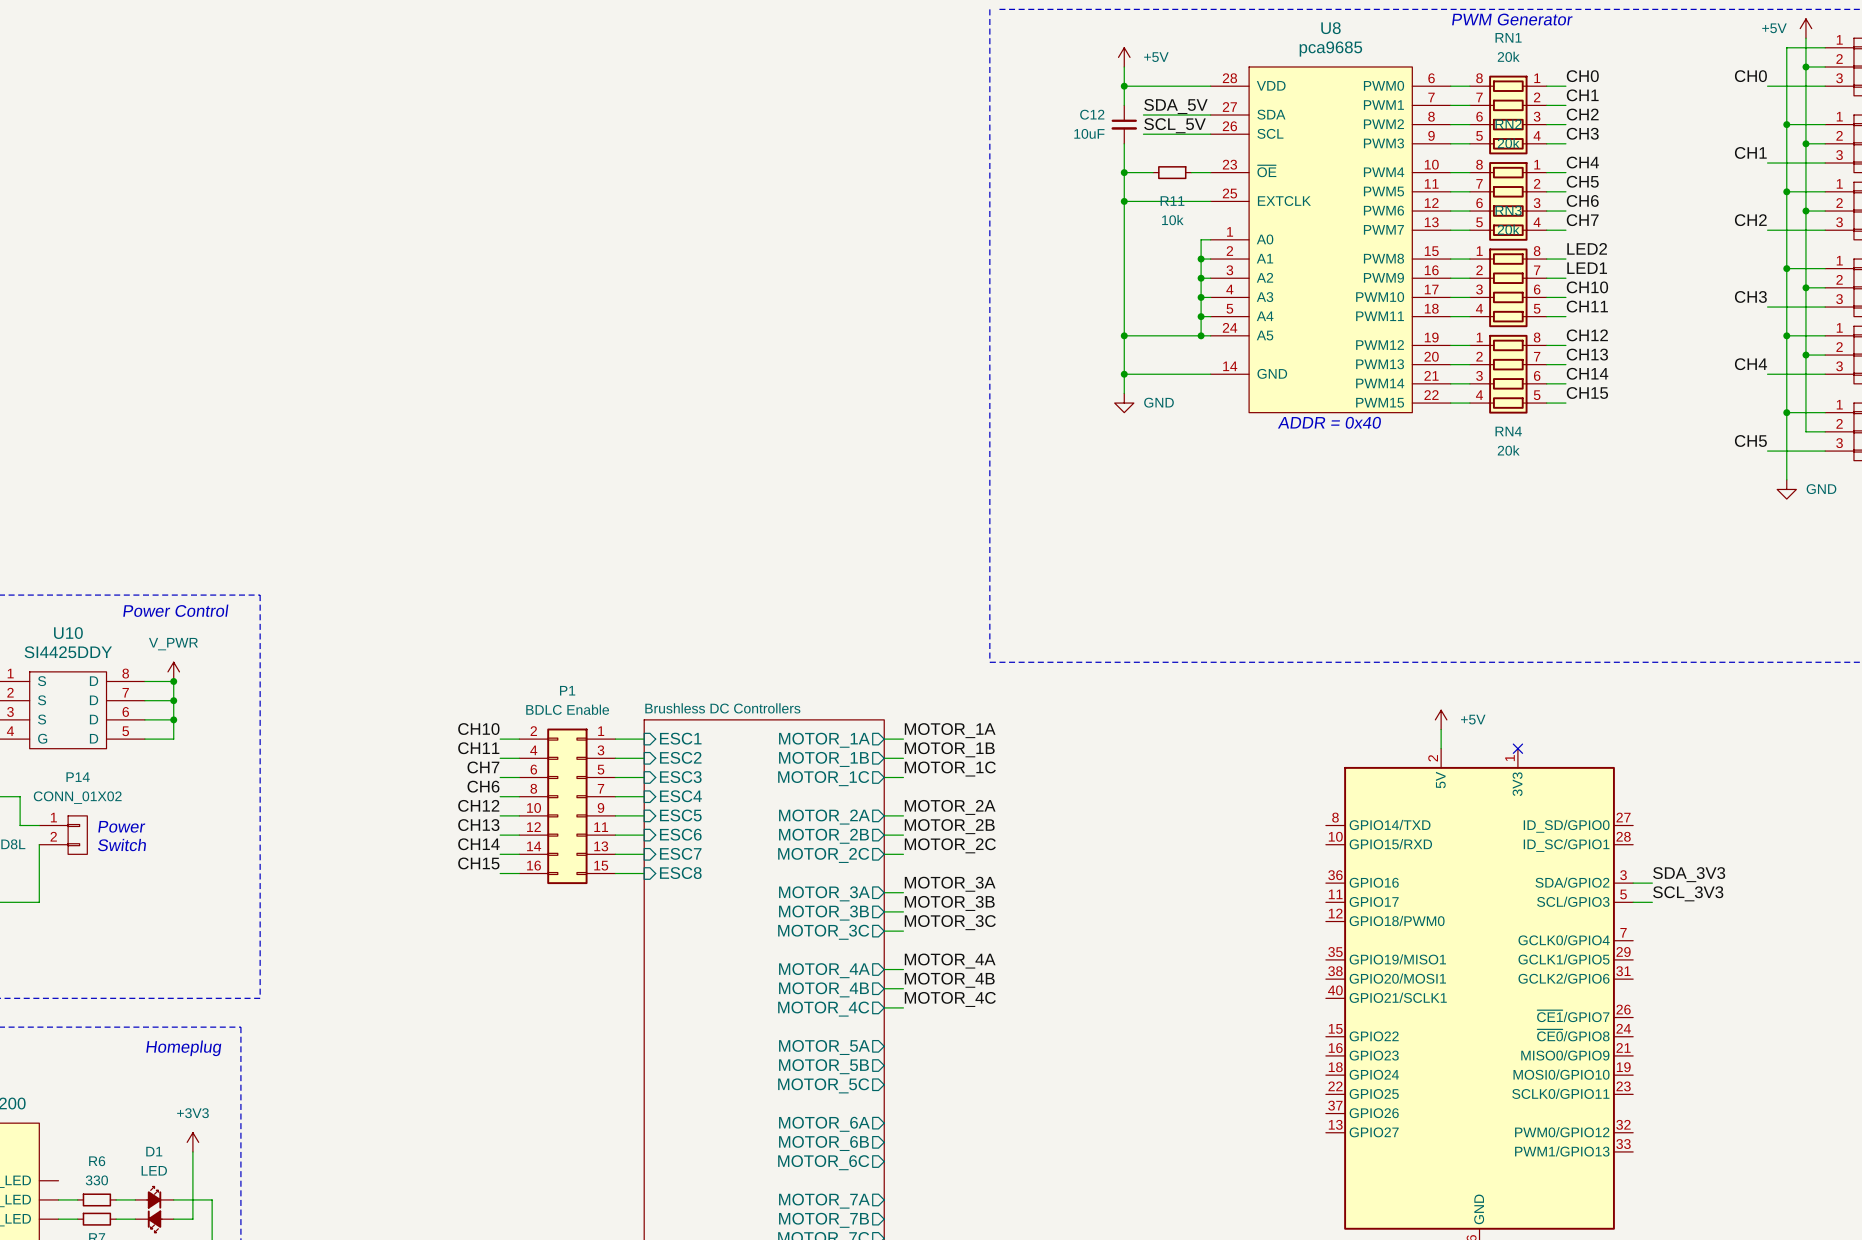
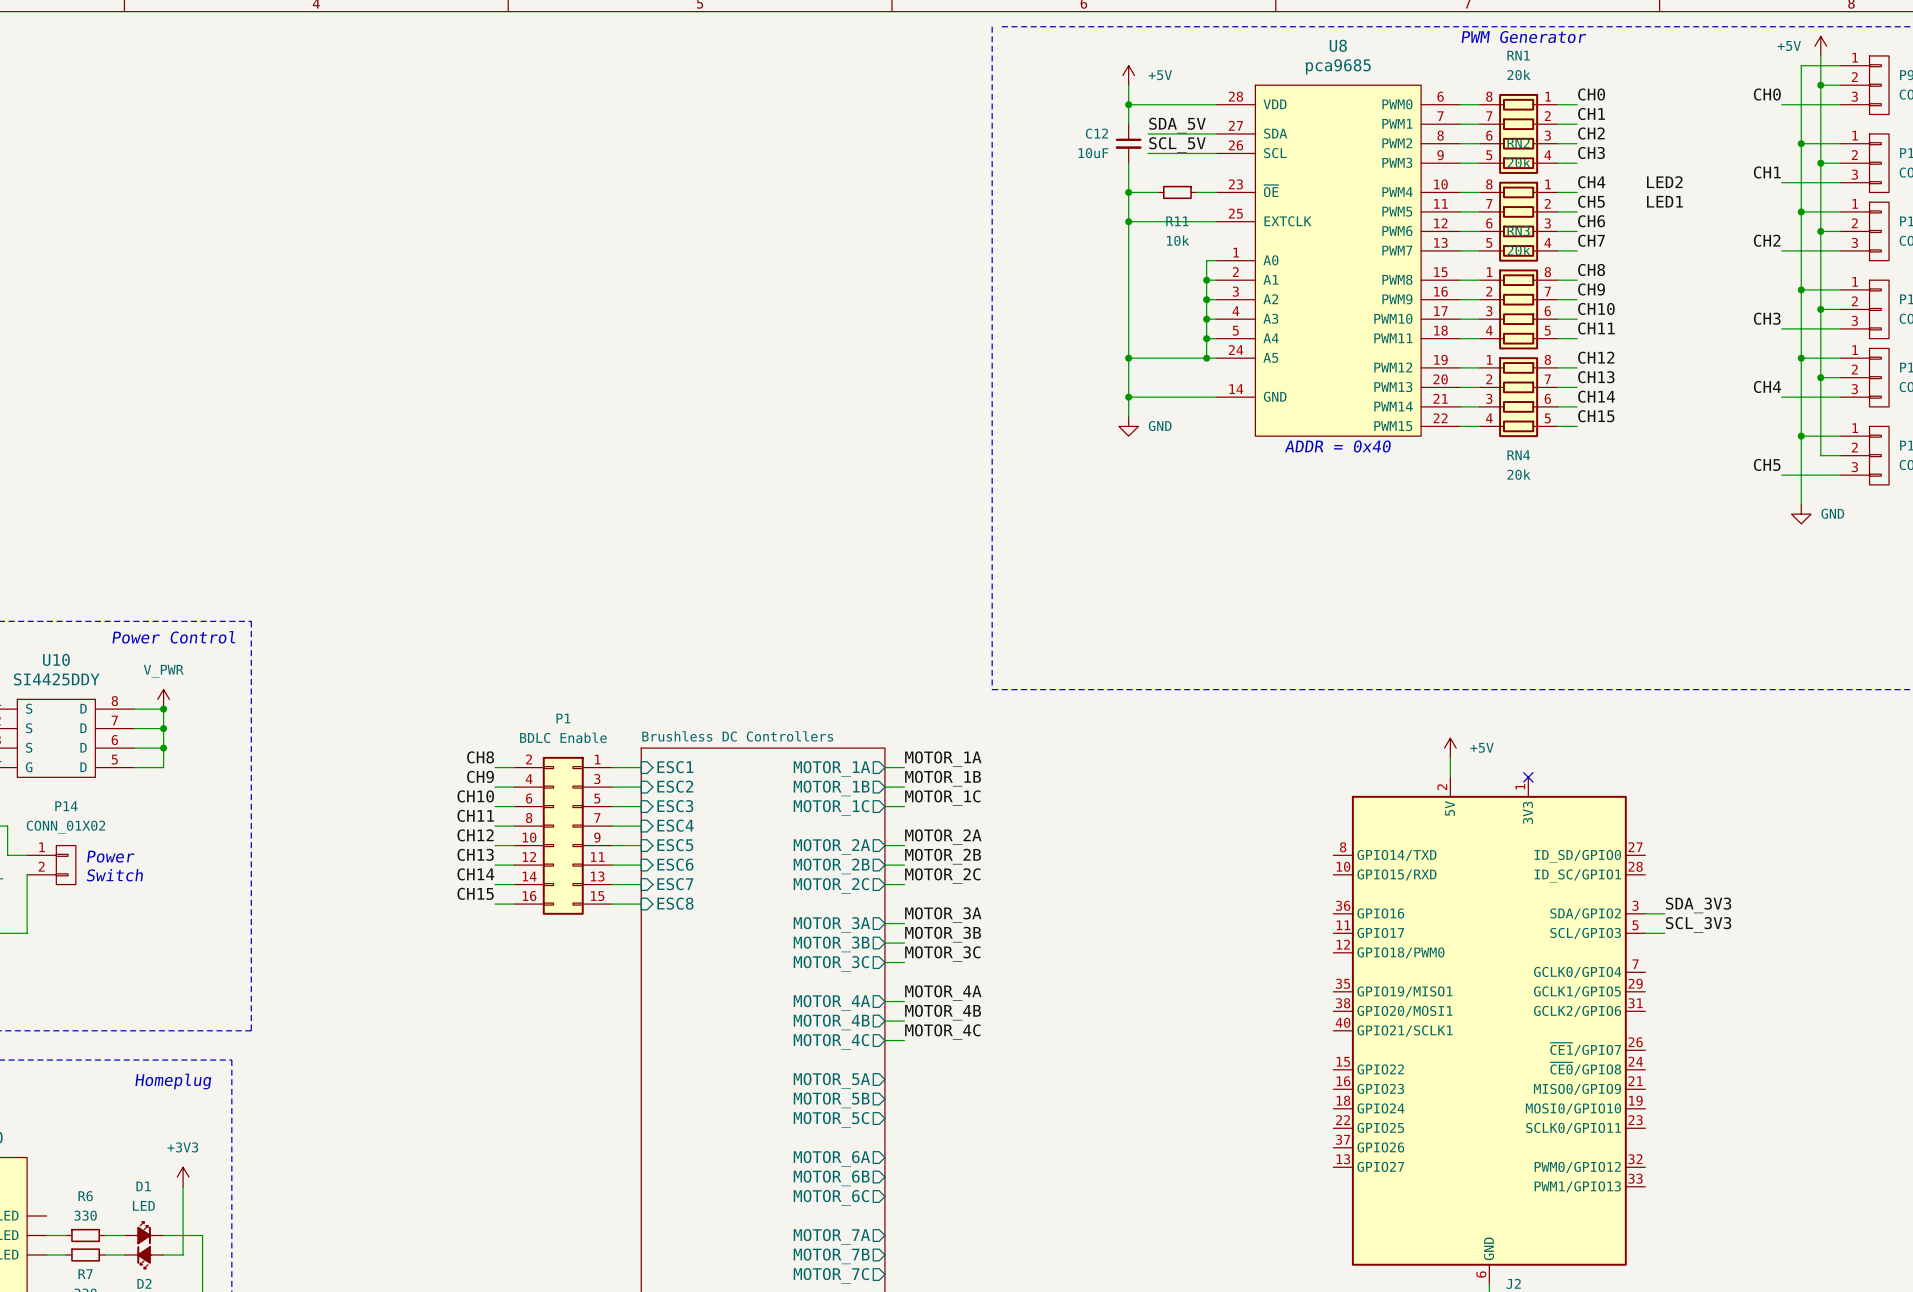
label: none -> LED2 (1664, 182)
label: none -> LED1 (1664, 201)
label: LED2 (1587, 248) -> CH8 (1591, 269)
label: LED1 (1587, 268) -> CH9 (1591, 289)
label: CH10 (478, 729) -> CH8 (480, 757)
label: CH11 (478, 748) -> CH9 (480, 776)
label: CH7 (483, 767) -> CH10 (475, 796)
label: CH6 (483, 786) -> CH11 (475, 815)

